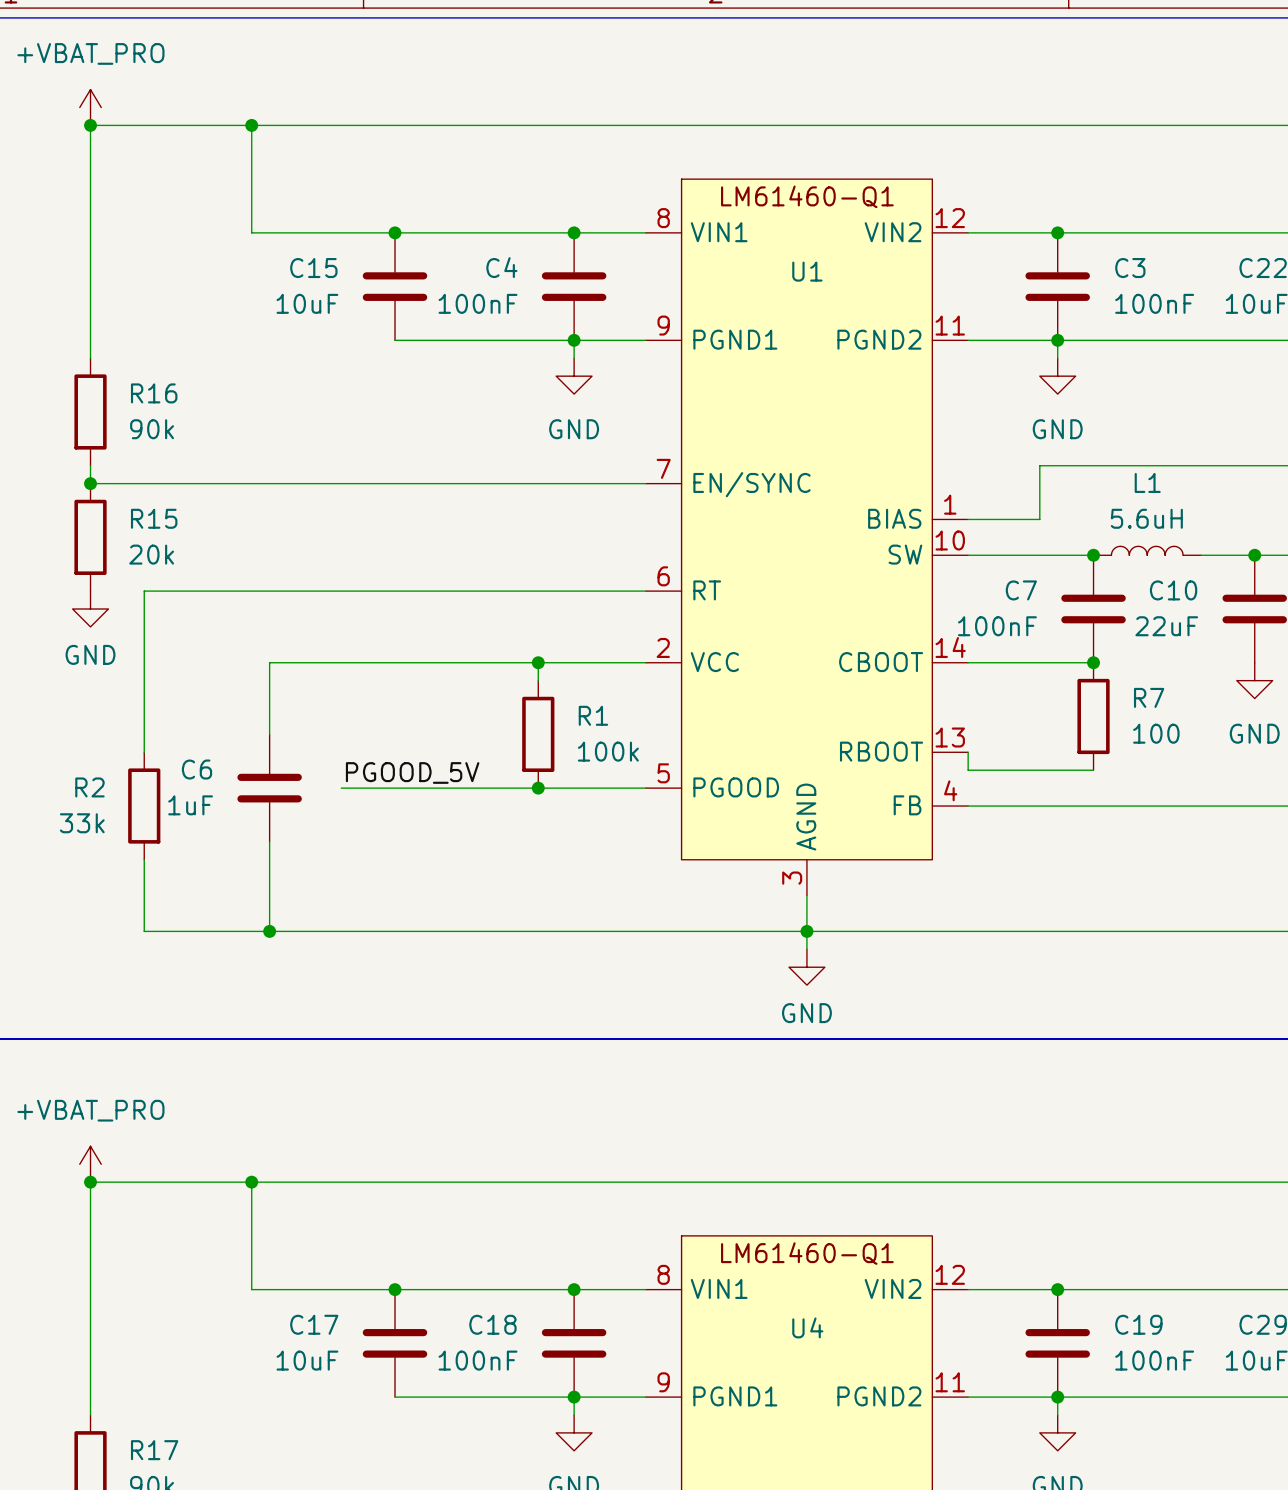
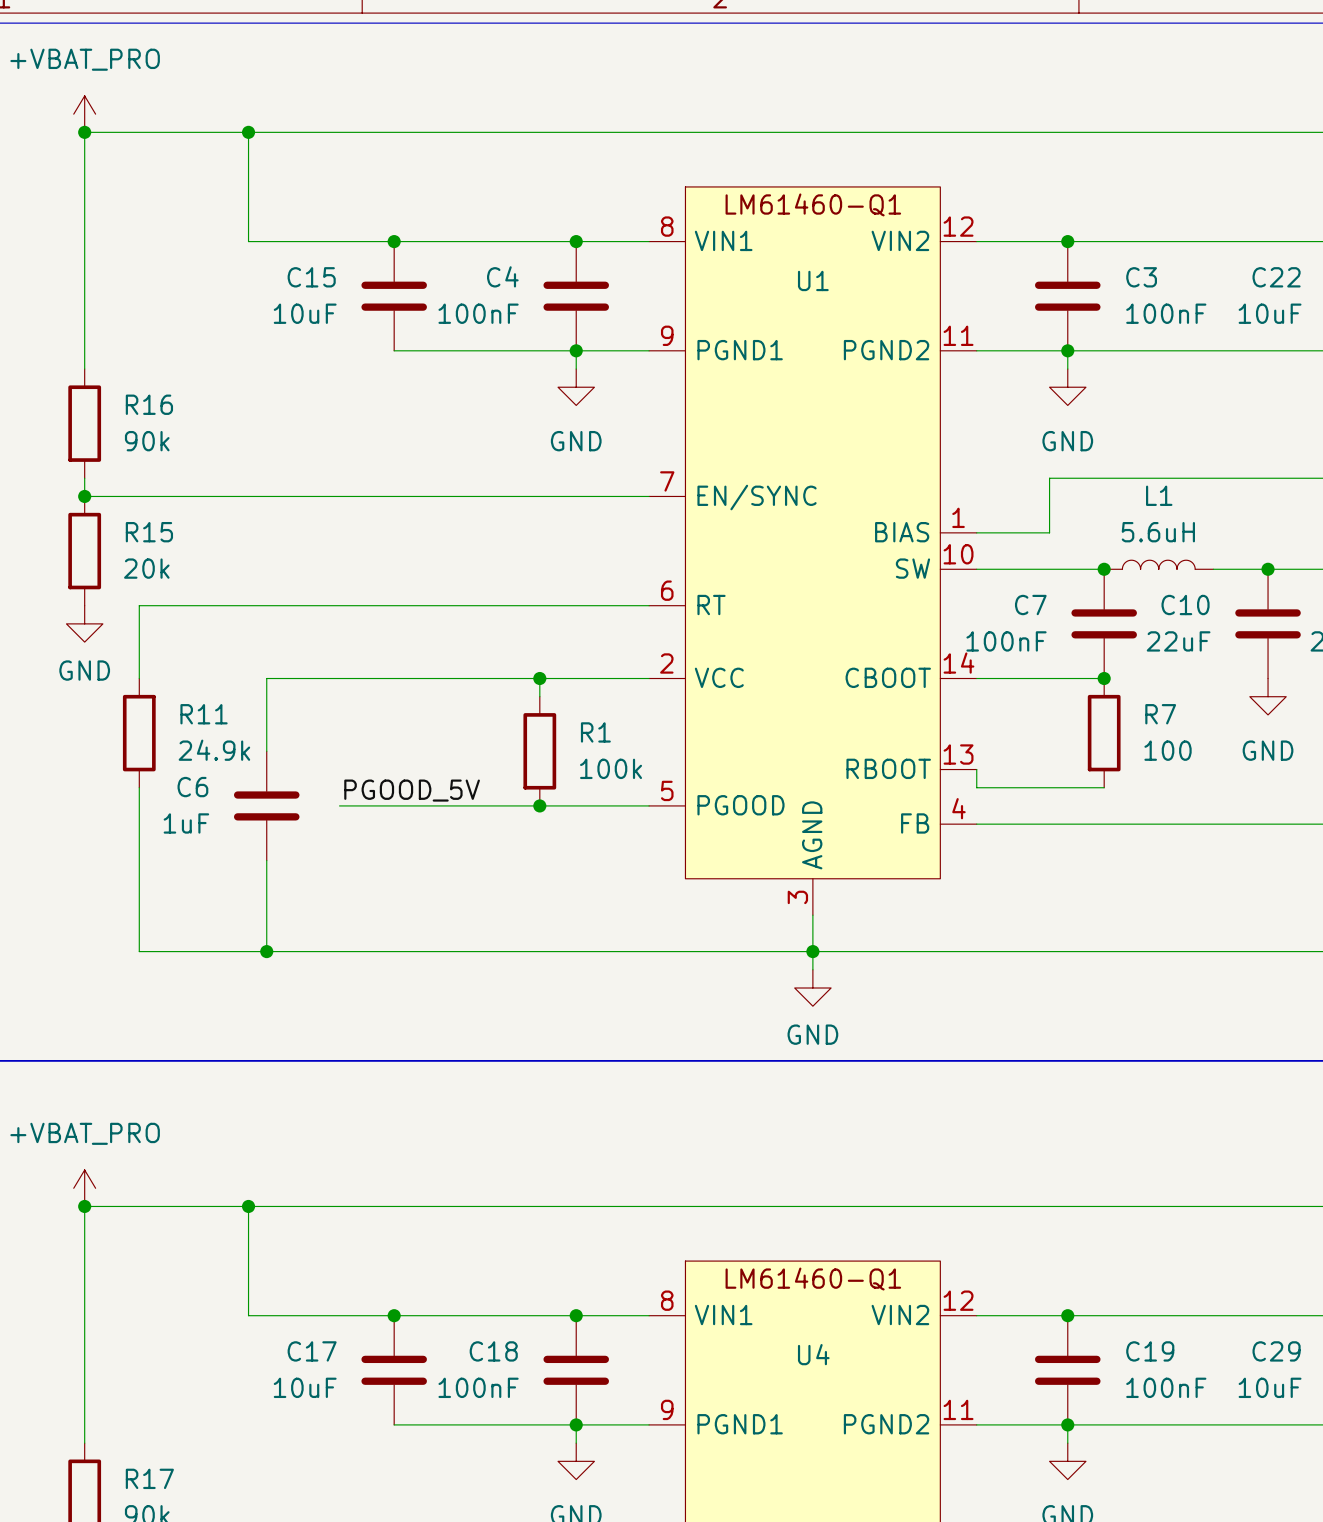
wire: (144, 662) (144, 752) -> (139, 787) (139, 878)
R11: none -> 24.9k (139, 733)
R2: 33k (144, 806) -> none

